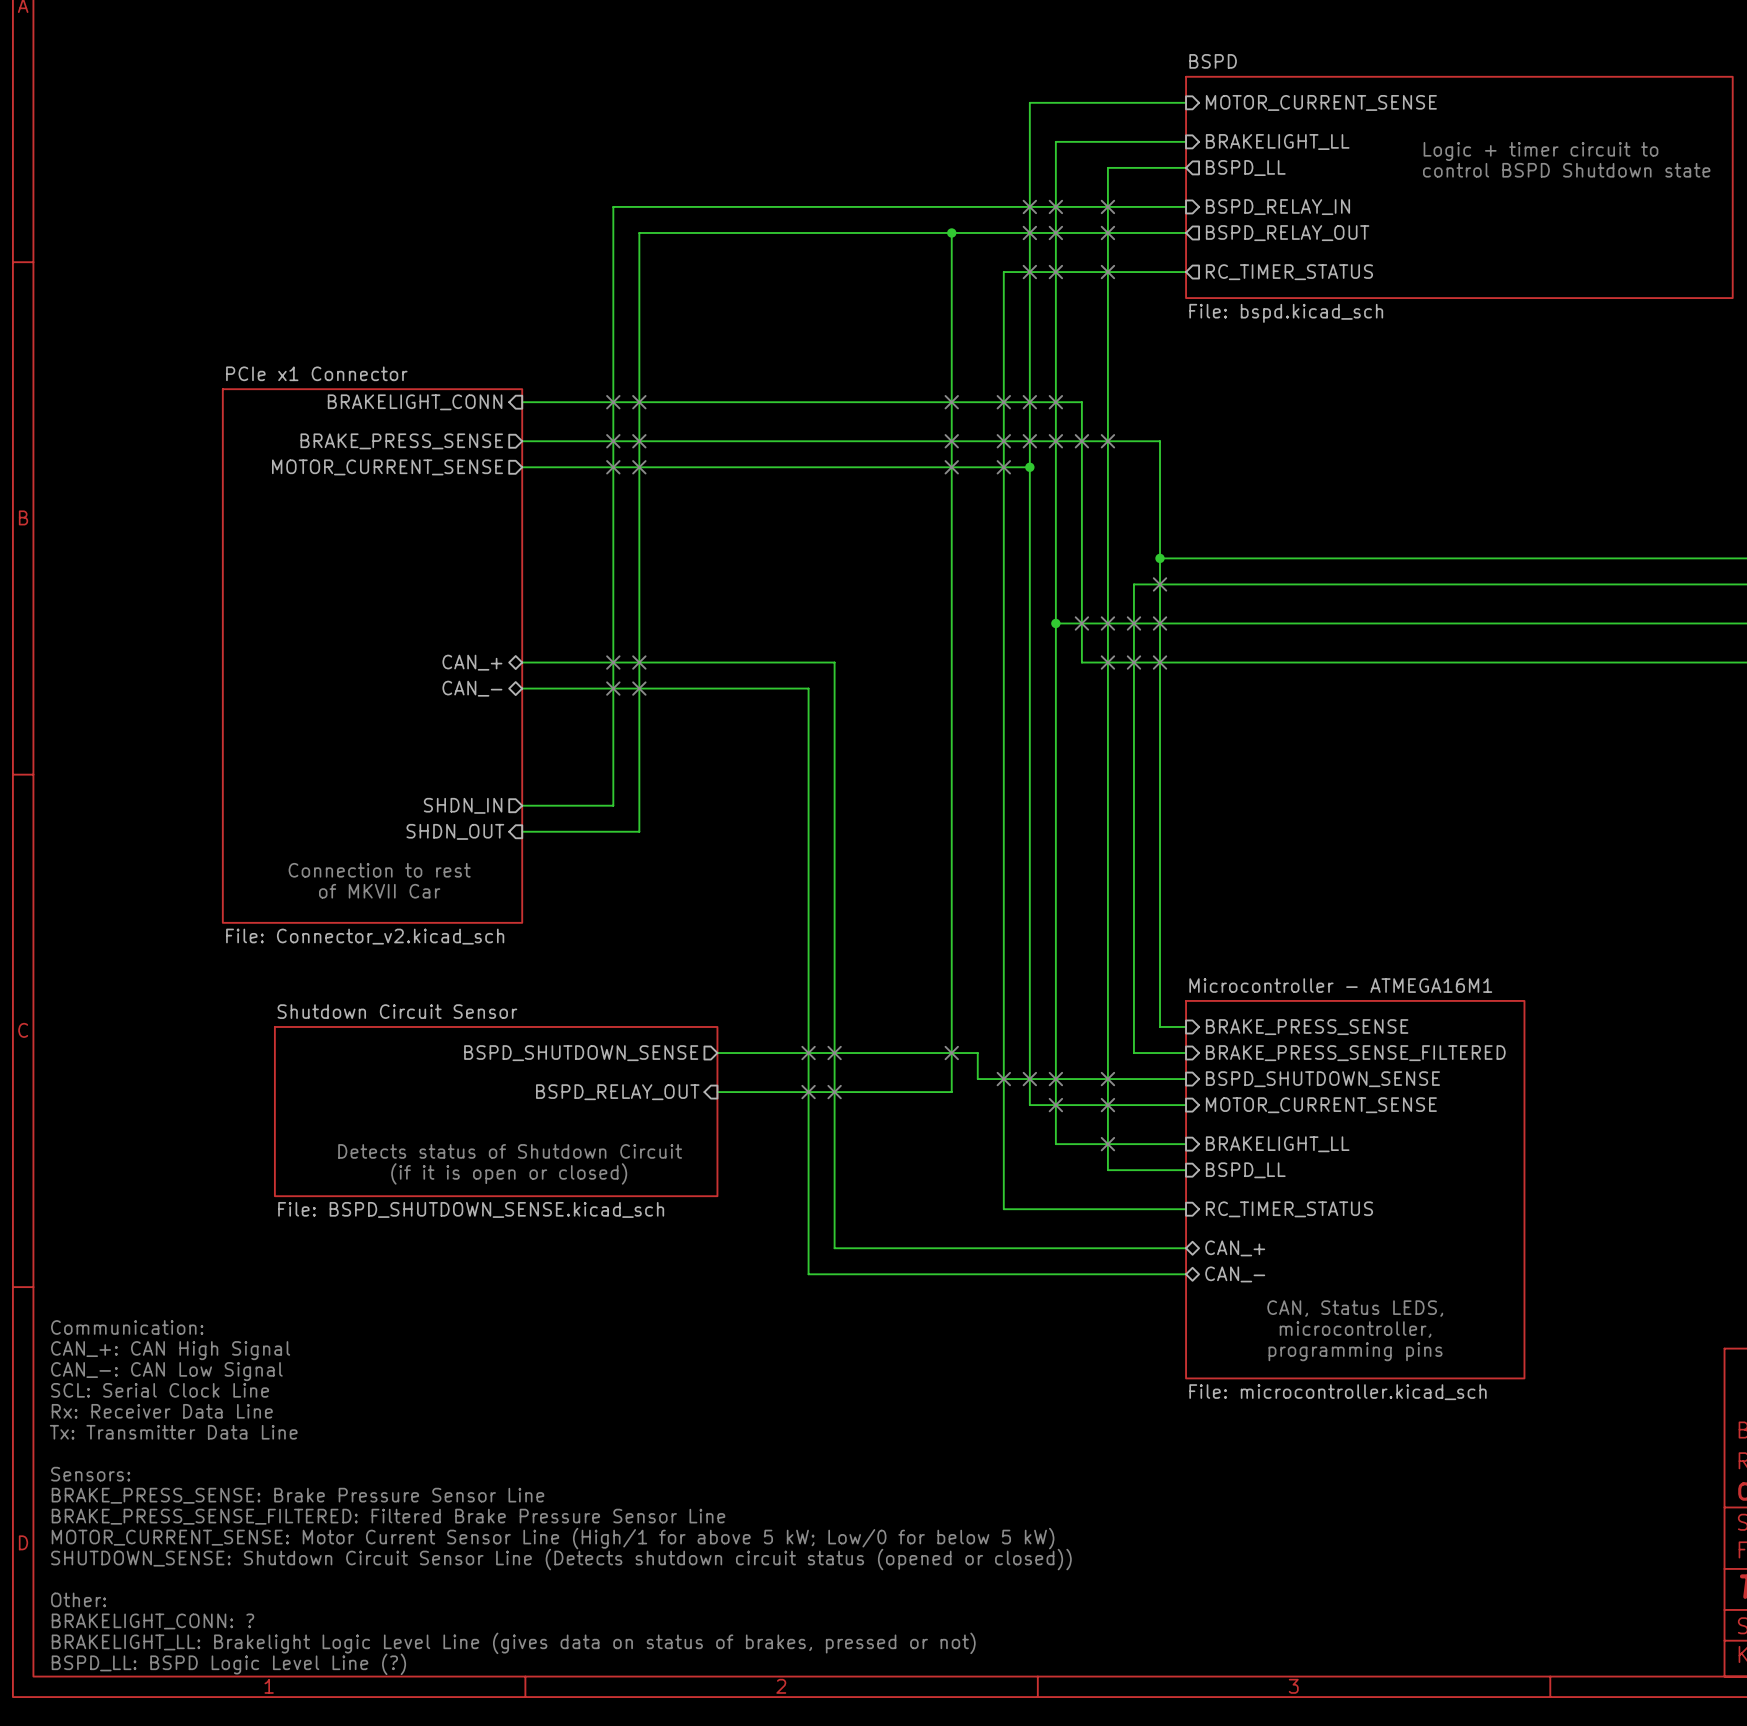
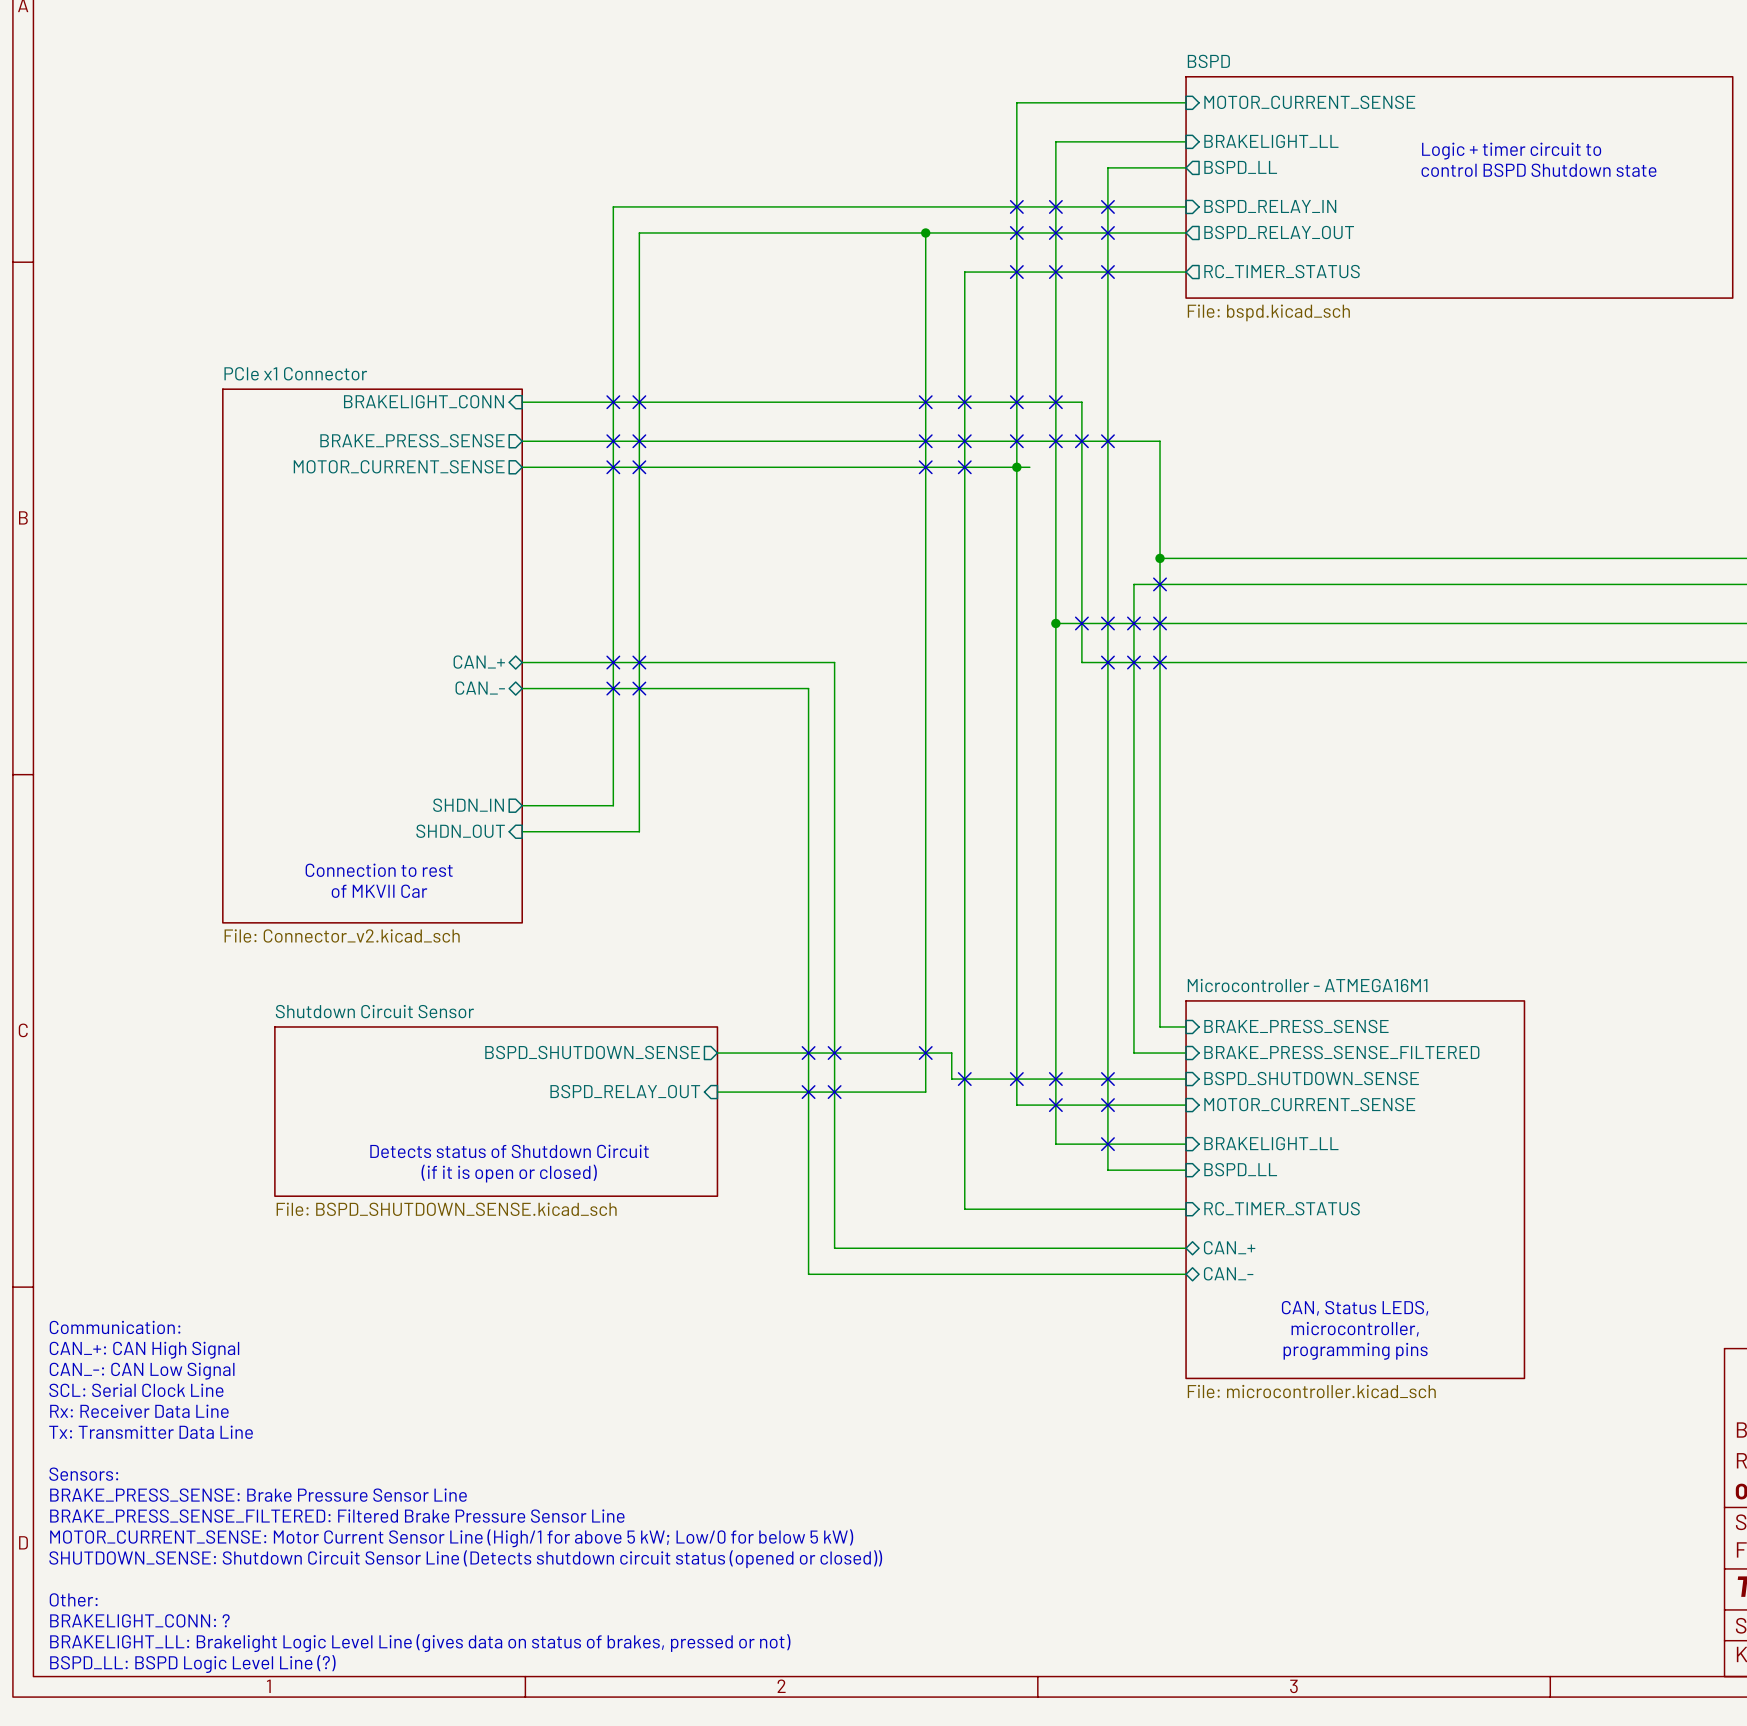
wire: (1029, 102) (1029, 1105) -> (1029, 102) (1016, 102) (1016, 1105) (1029, 1105)
no-connect mark position: (1029, 206) -> (1016, 206)
wire: none -> (925, 232) (925, 1092)
wire: (951, 232) (951, 1053) (977, 1053) (977, 1079) -> none
junction position: (951, 232) -> (925, 232)
no-connect mark position: (1029, 232) -> (1016, 232)
wire: (1003, 272) (1003, 1209) -> (1003, 272) (964, 272) (964, 1209) (1003, 1209)
no-connect mark position: (1029, 272) -> (1016, 272)
no-connect mark: none -> (925, 402)
no-connect mark: (951, 402) -> none
no-connect mark: none -> (964, 402)
no-connect mark: (1003, 402) -> none
no-connect mark: none -> (1016, 402)
no-connect mark: (1029, 402) -> none
no-connect mark: none -> (925, 441)
no-connect mark: (951, 441) -> none
no-connect mark: none -> (964, 441)
no-connect mark: (1003, 441) -> none
no-connect mark: none -> (1016, 441)
no-connect mark: (1029, 441) -> none
no-connect mark: none -> (925, 467)
no-connect mark: (951, 467) -> none
no-connect mark: none -> (964, 467)
no-connect mark: (1003, 467) -> none
junction position: (1029, 467) -> (1016, 467)
no-connect mark: none -> (925, 1053)
no-connect mark: (951, 1053) -> none
wire: (951, 1079) (951, 1092) (925, 1092) -> (951, 1079) (977, 1079)
no-connect mark: none -> (964, 1079)
no-connect mark: (1003, 1079) -> none
no-connect mark: none -> (1016, 1079)
no-connect mark: (1029, 1079) -> none

